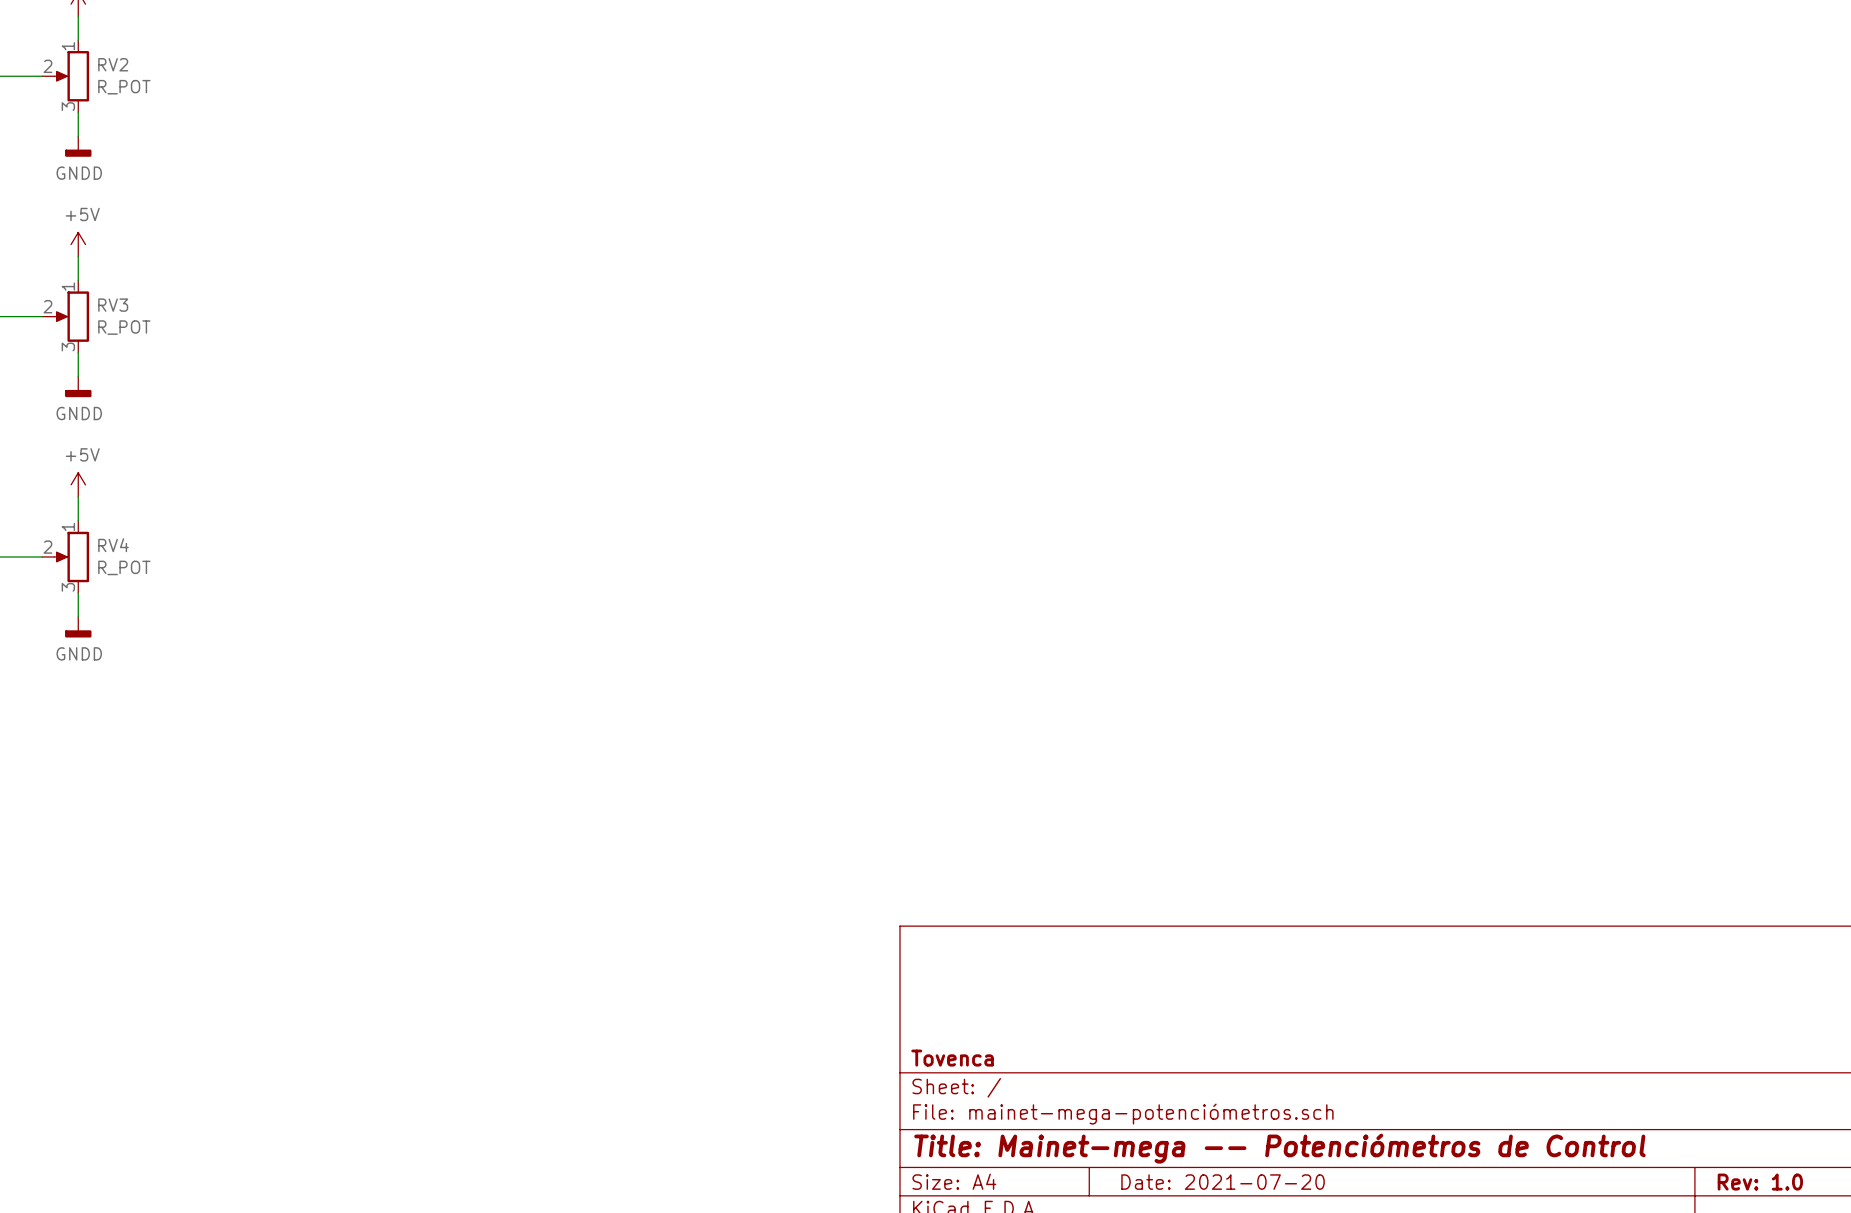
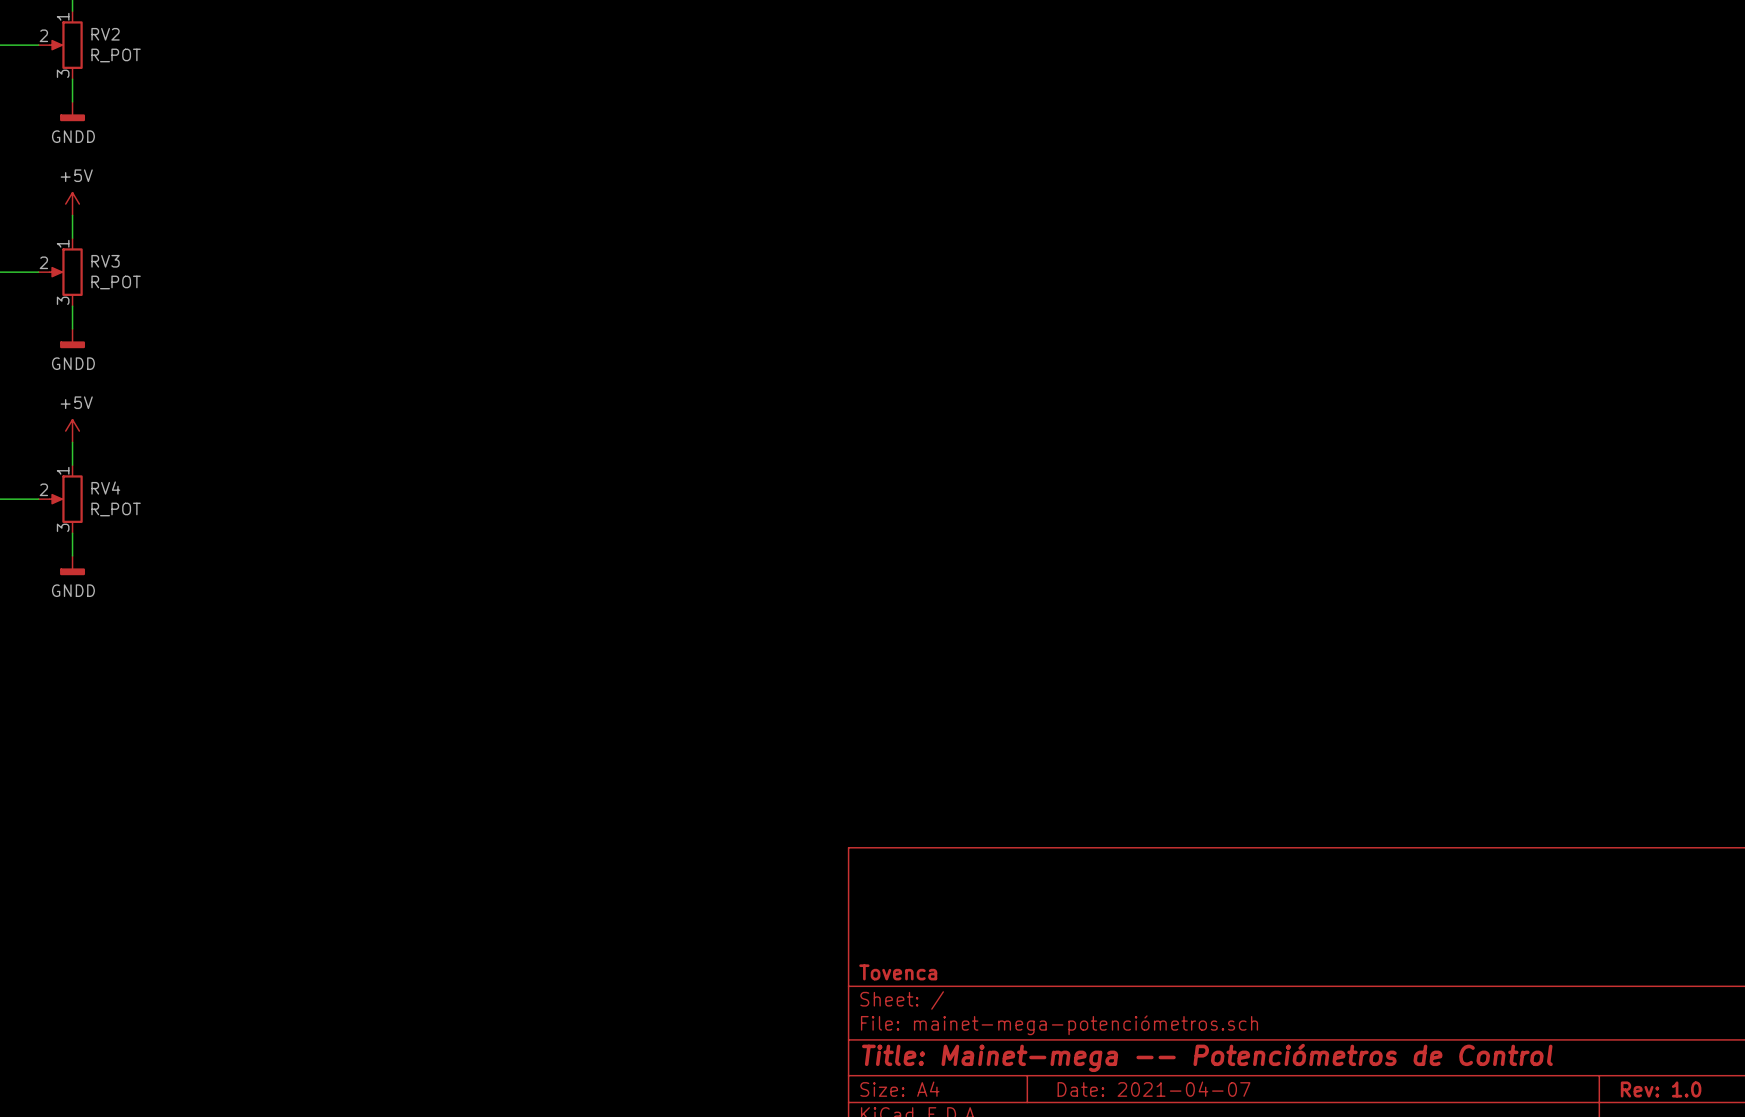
title block: Date: 2021-07-20 (1223, 1182) -> Date: 2021-04-07 (1153, 1089)

